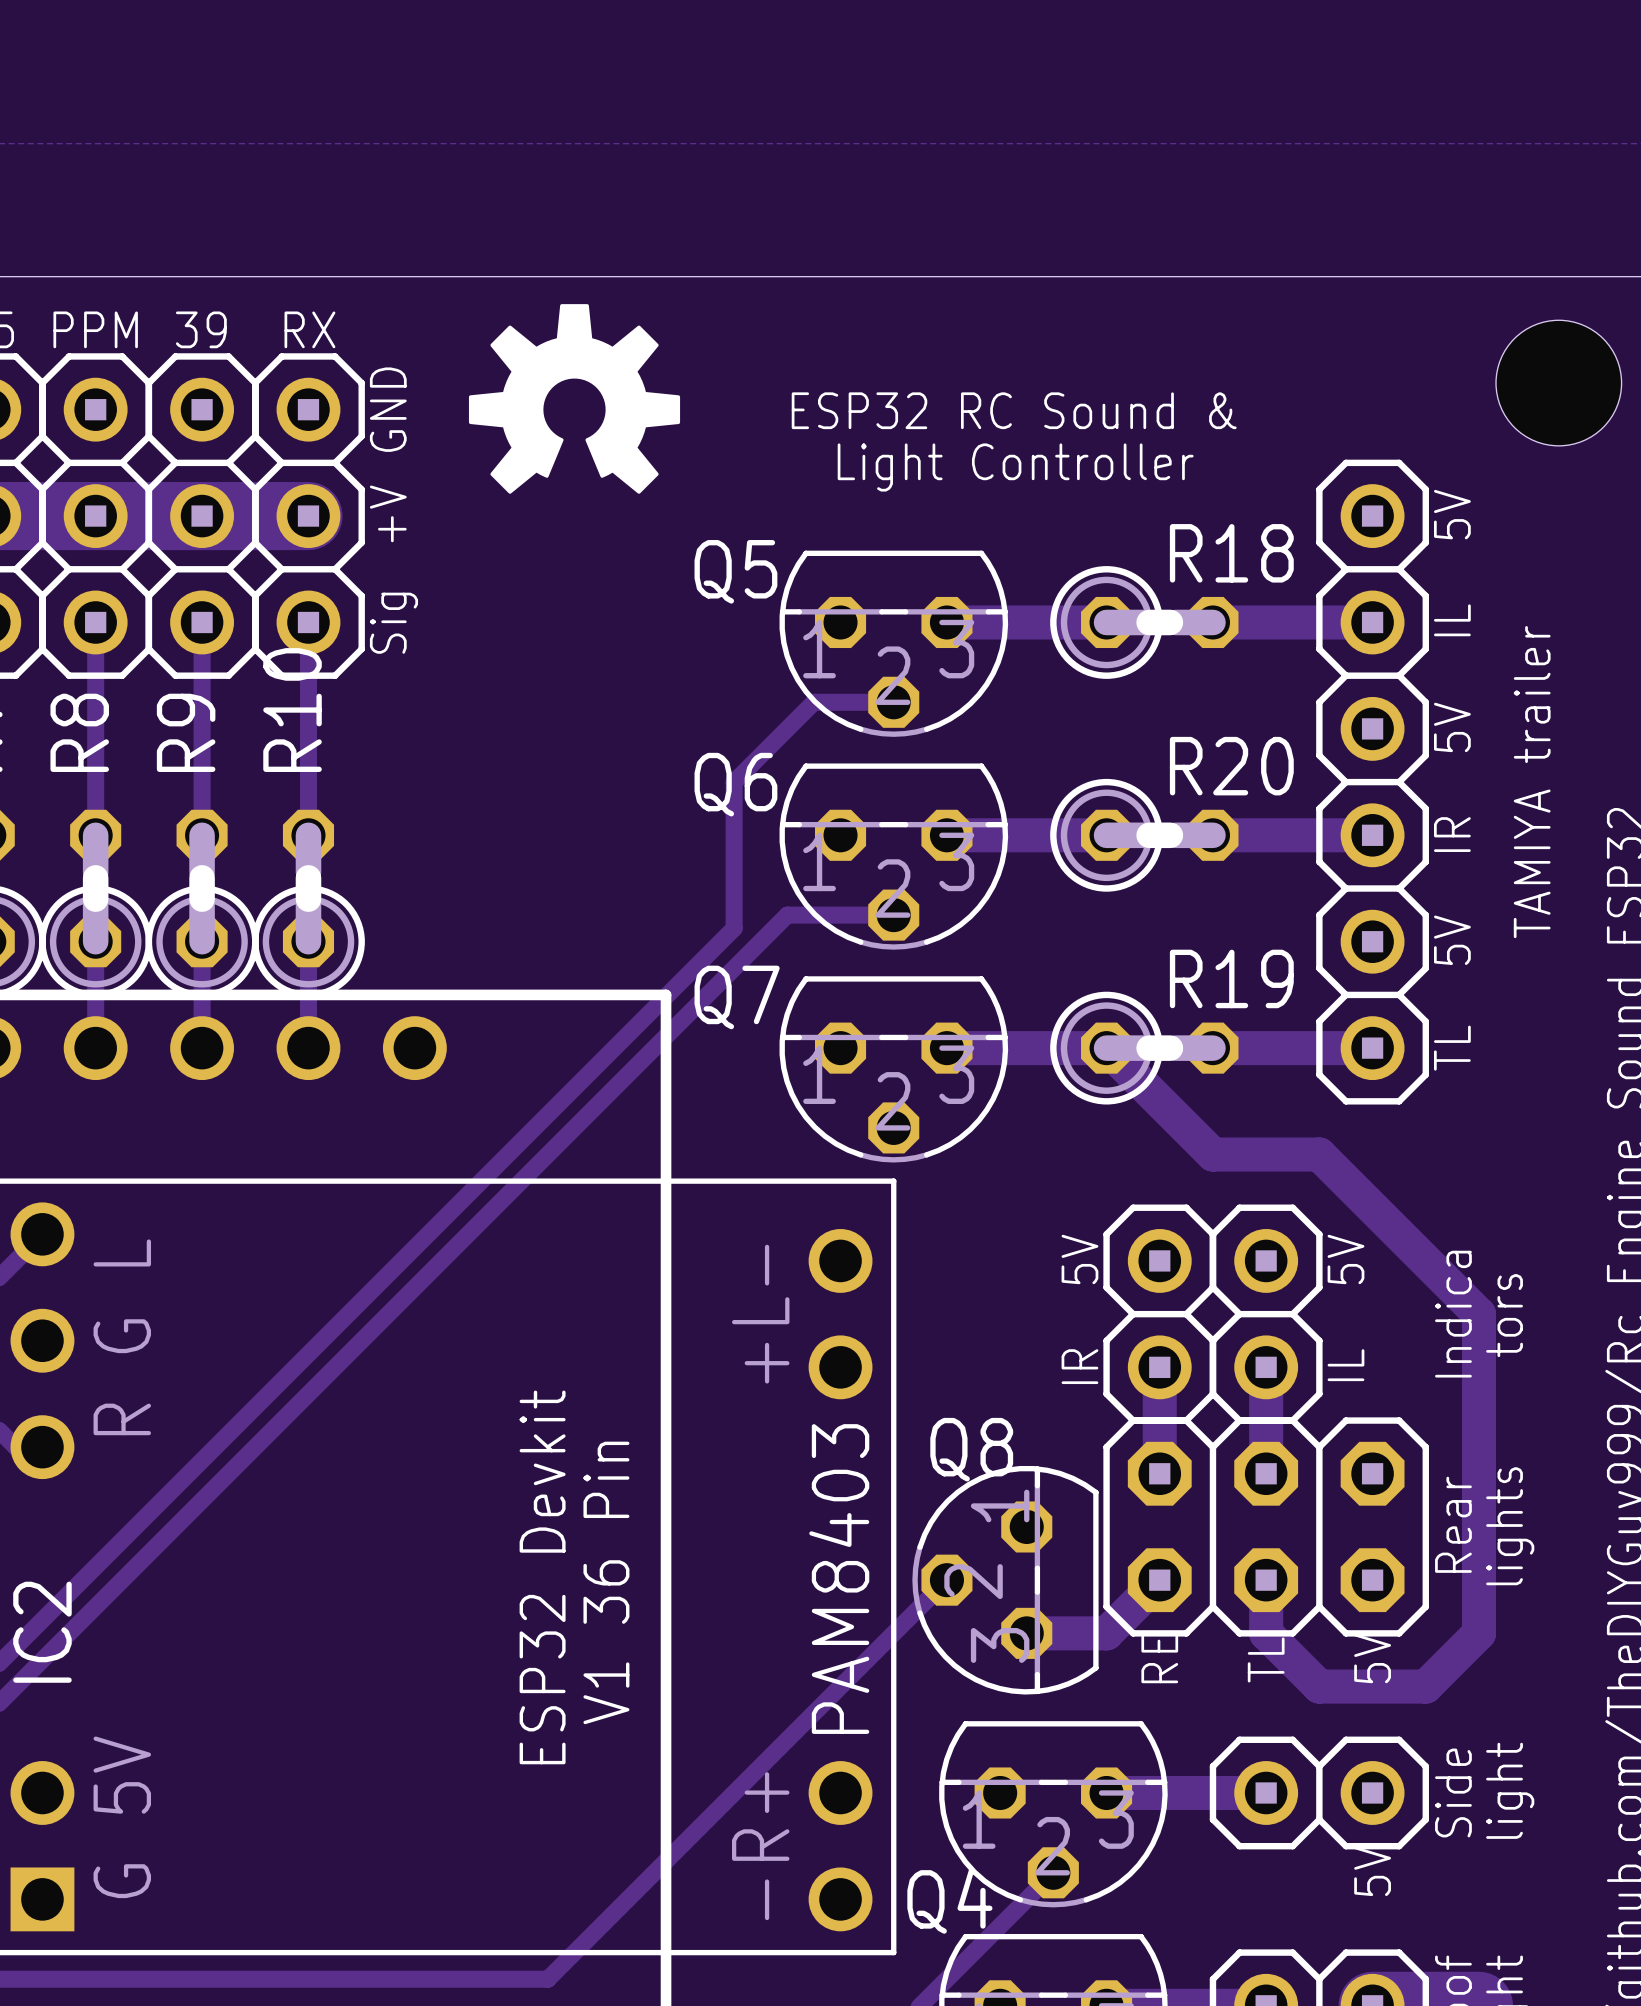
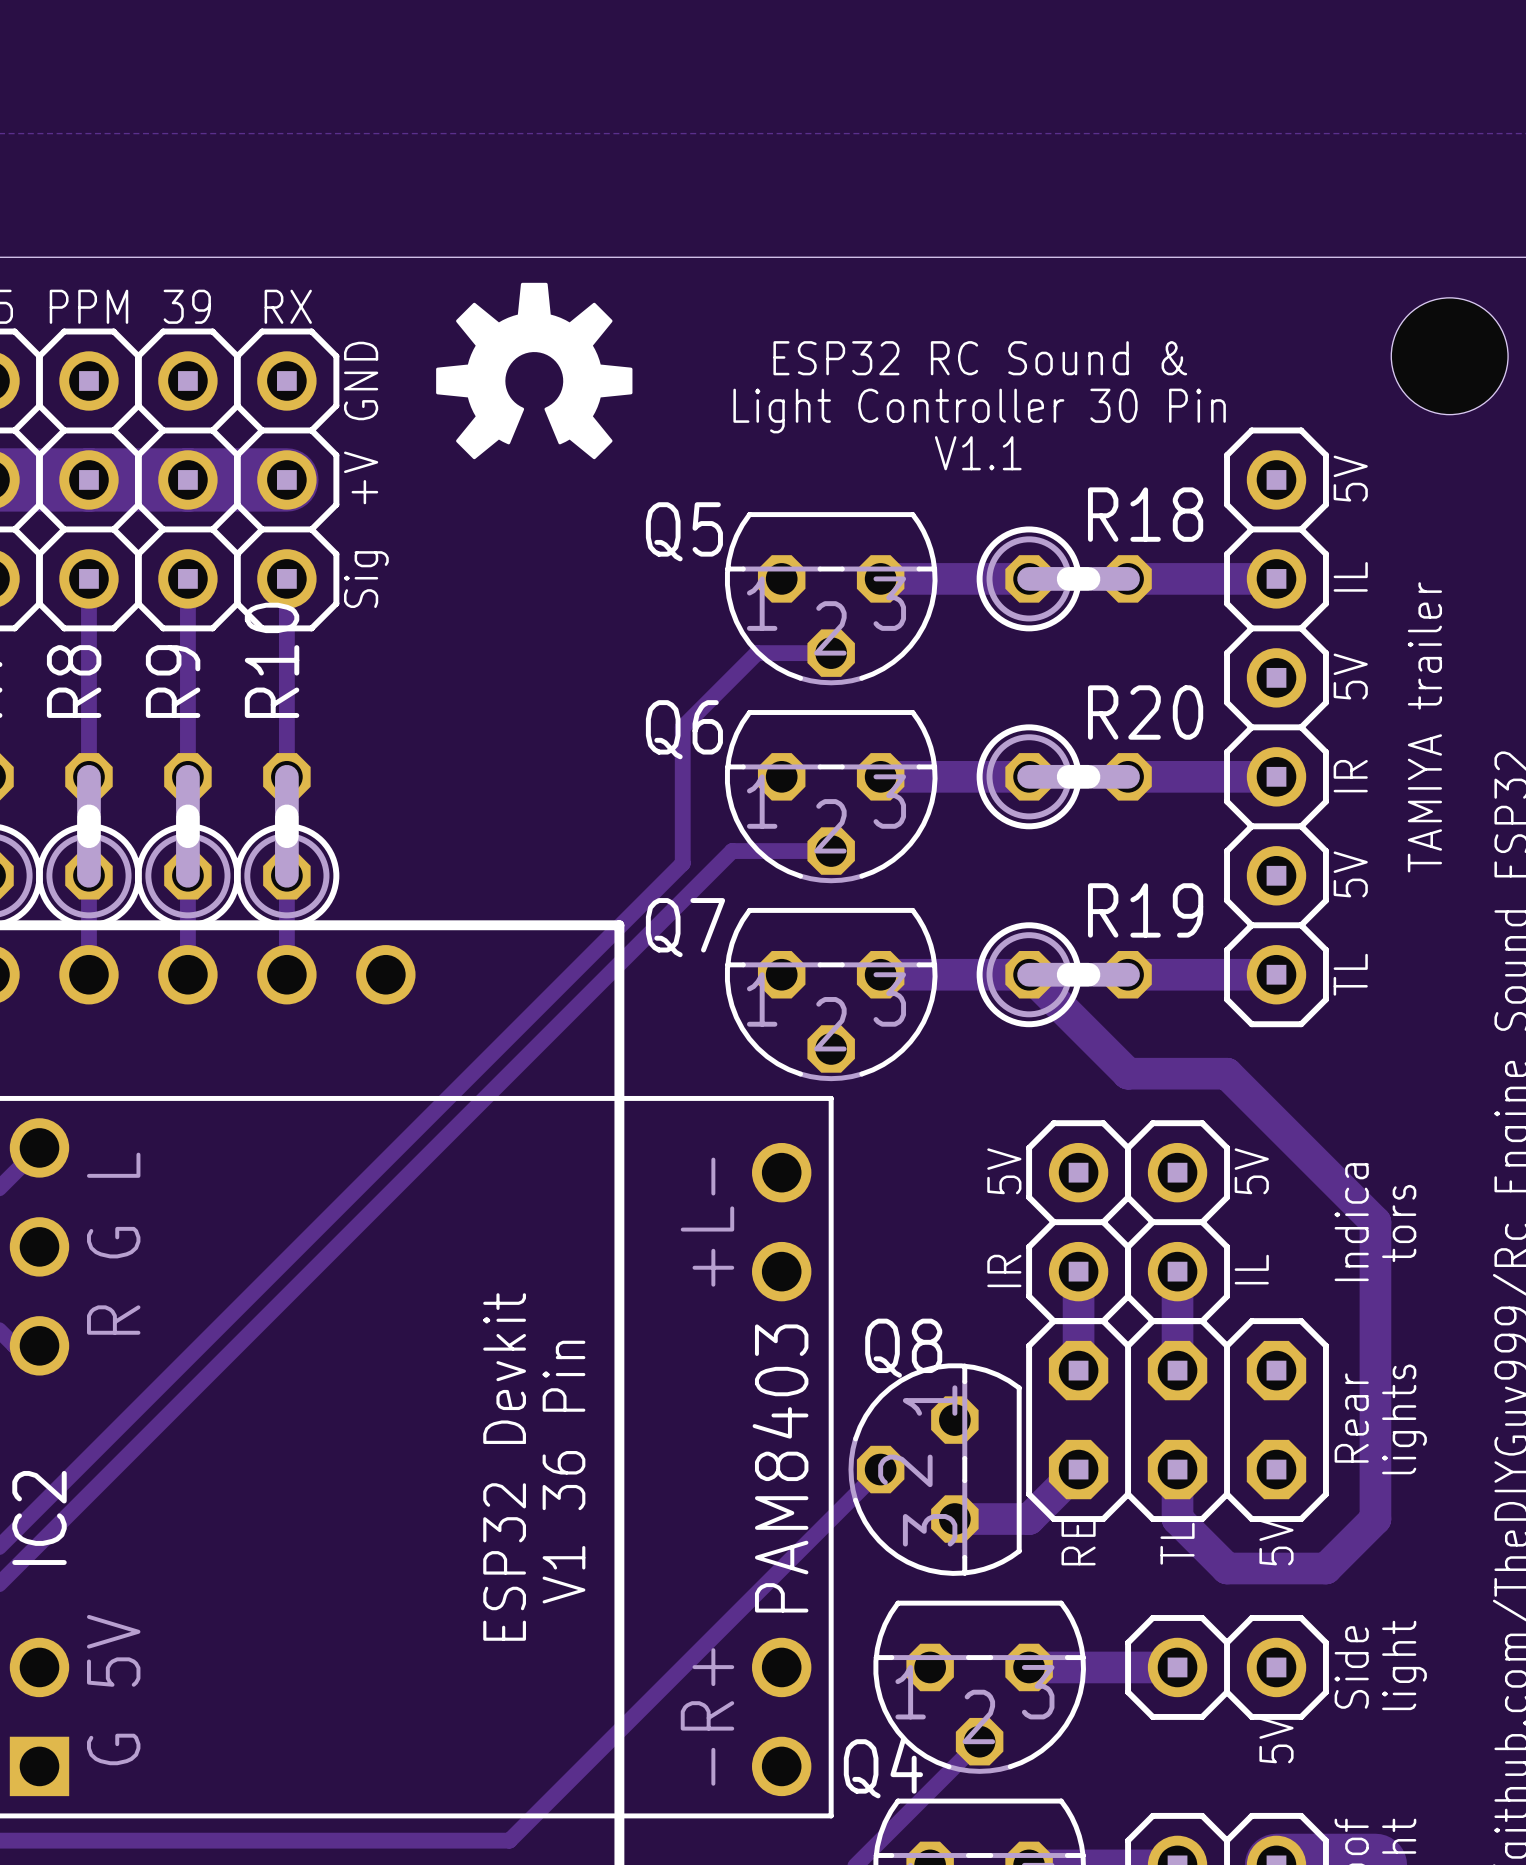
text position: ESP32 RC Sound & (1014, 410) -> ESP32 RC Sound & (980, 358)
text: Light Controller (1015, 467) -> Light Controller 30 Pin (979, 411)
text: none -> V1.1 (978, 453)

